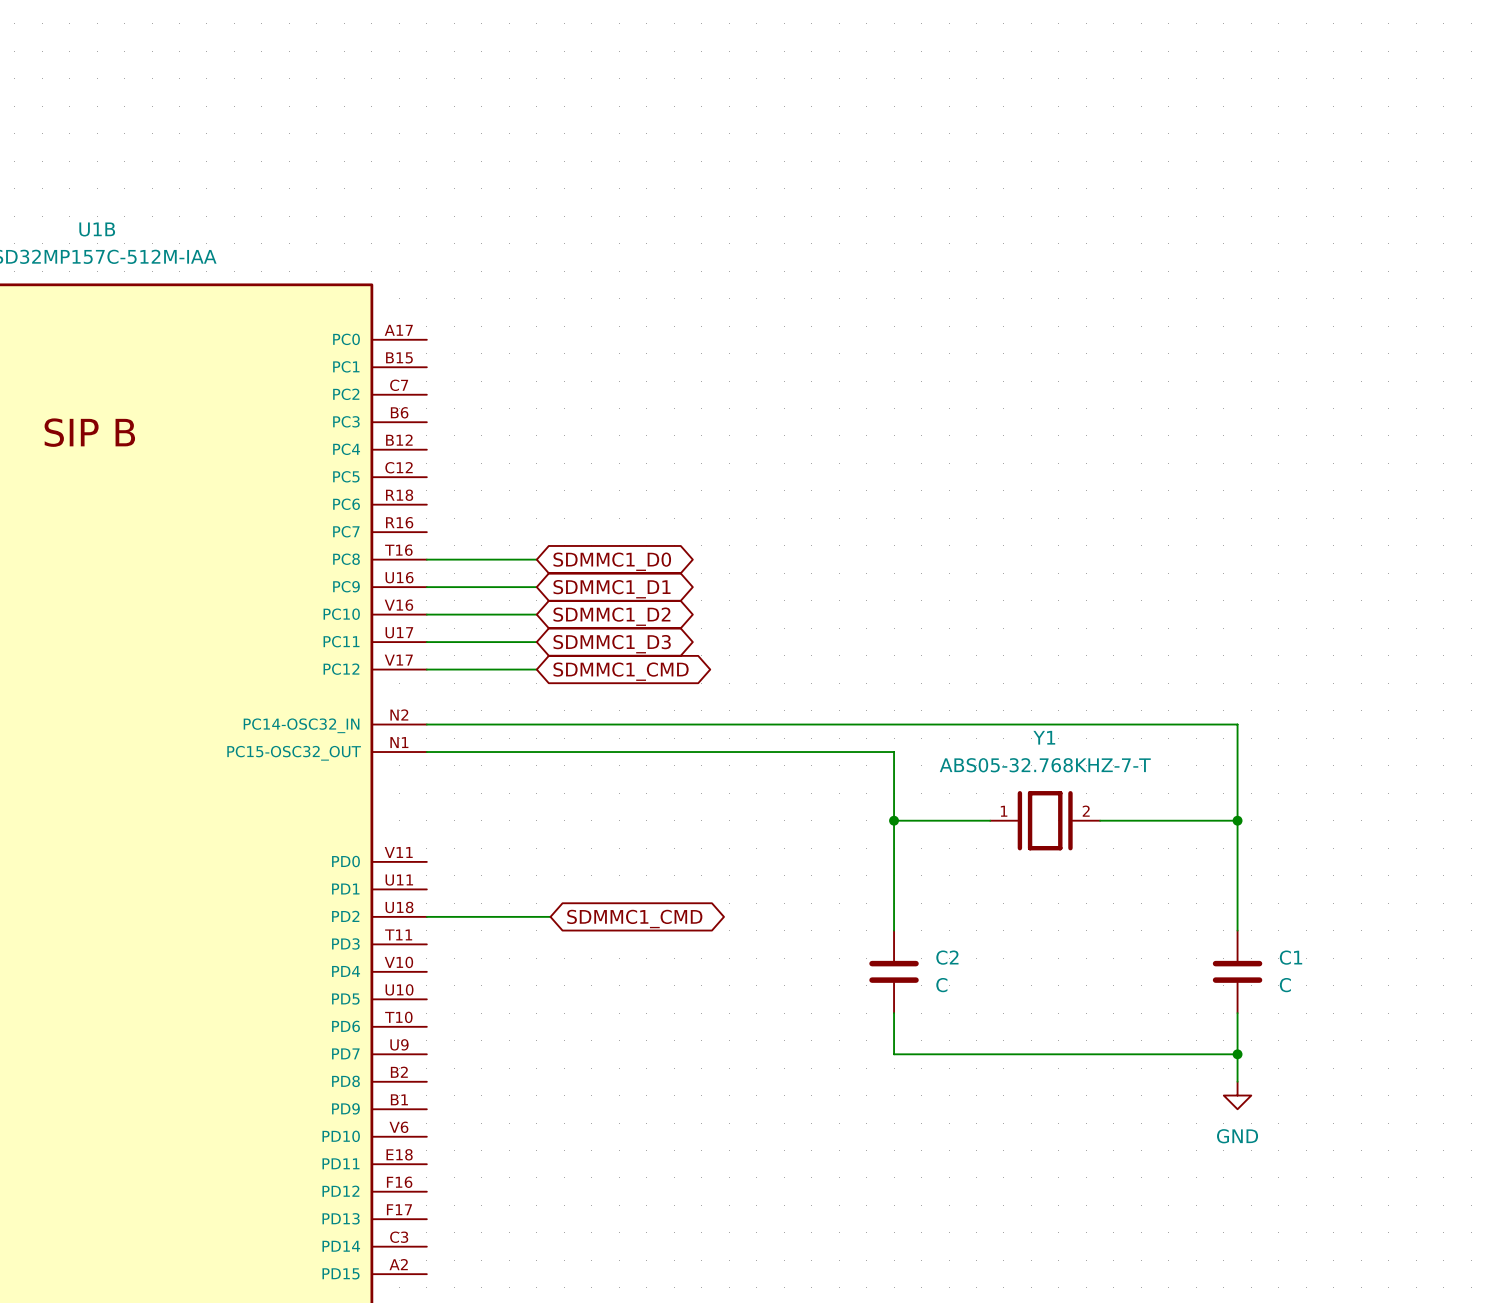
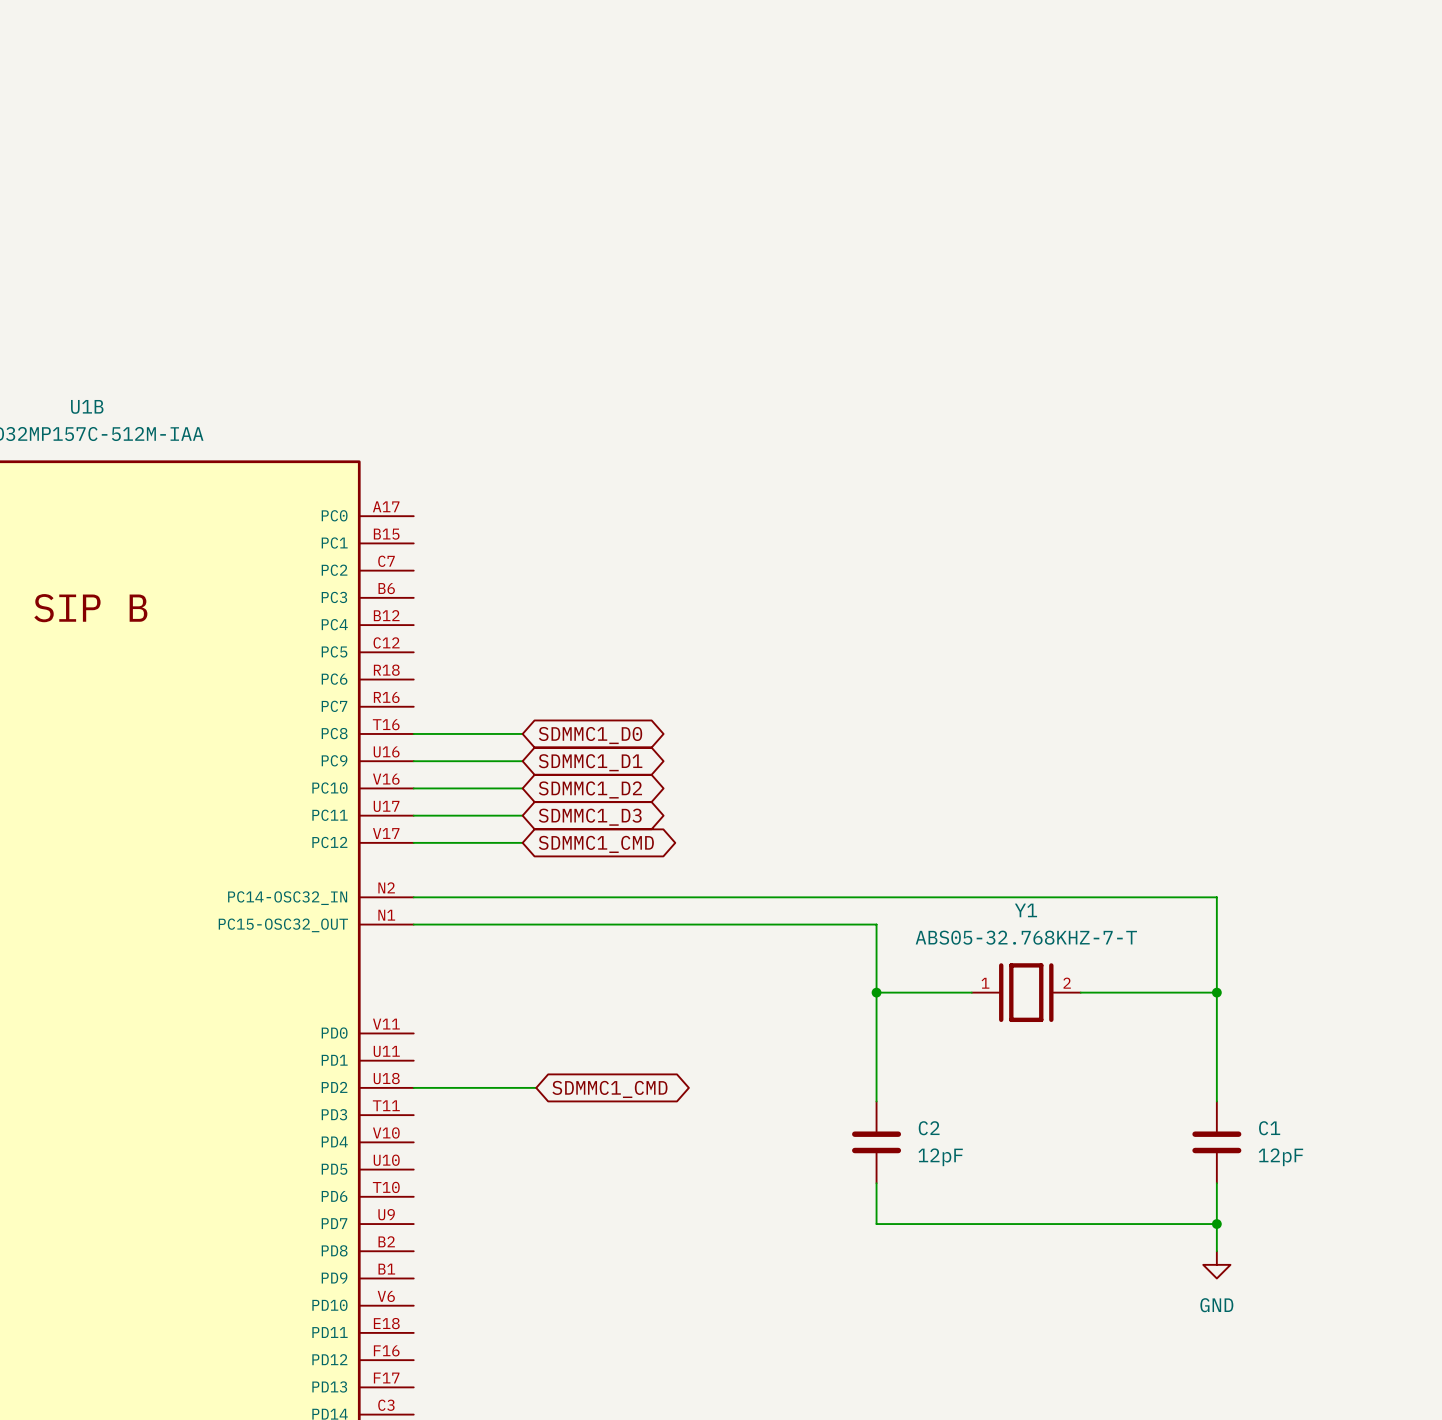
C2 value: C (941, 985) -> 12pF (940, 1157)
C1 value: C (1285, 985) -> 12pF (1280, 1157)

